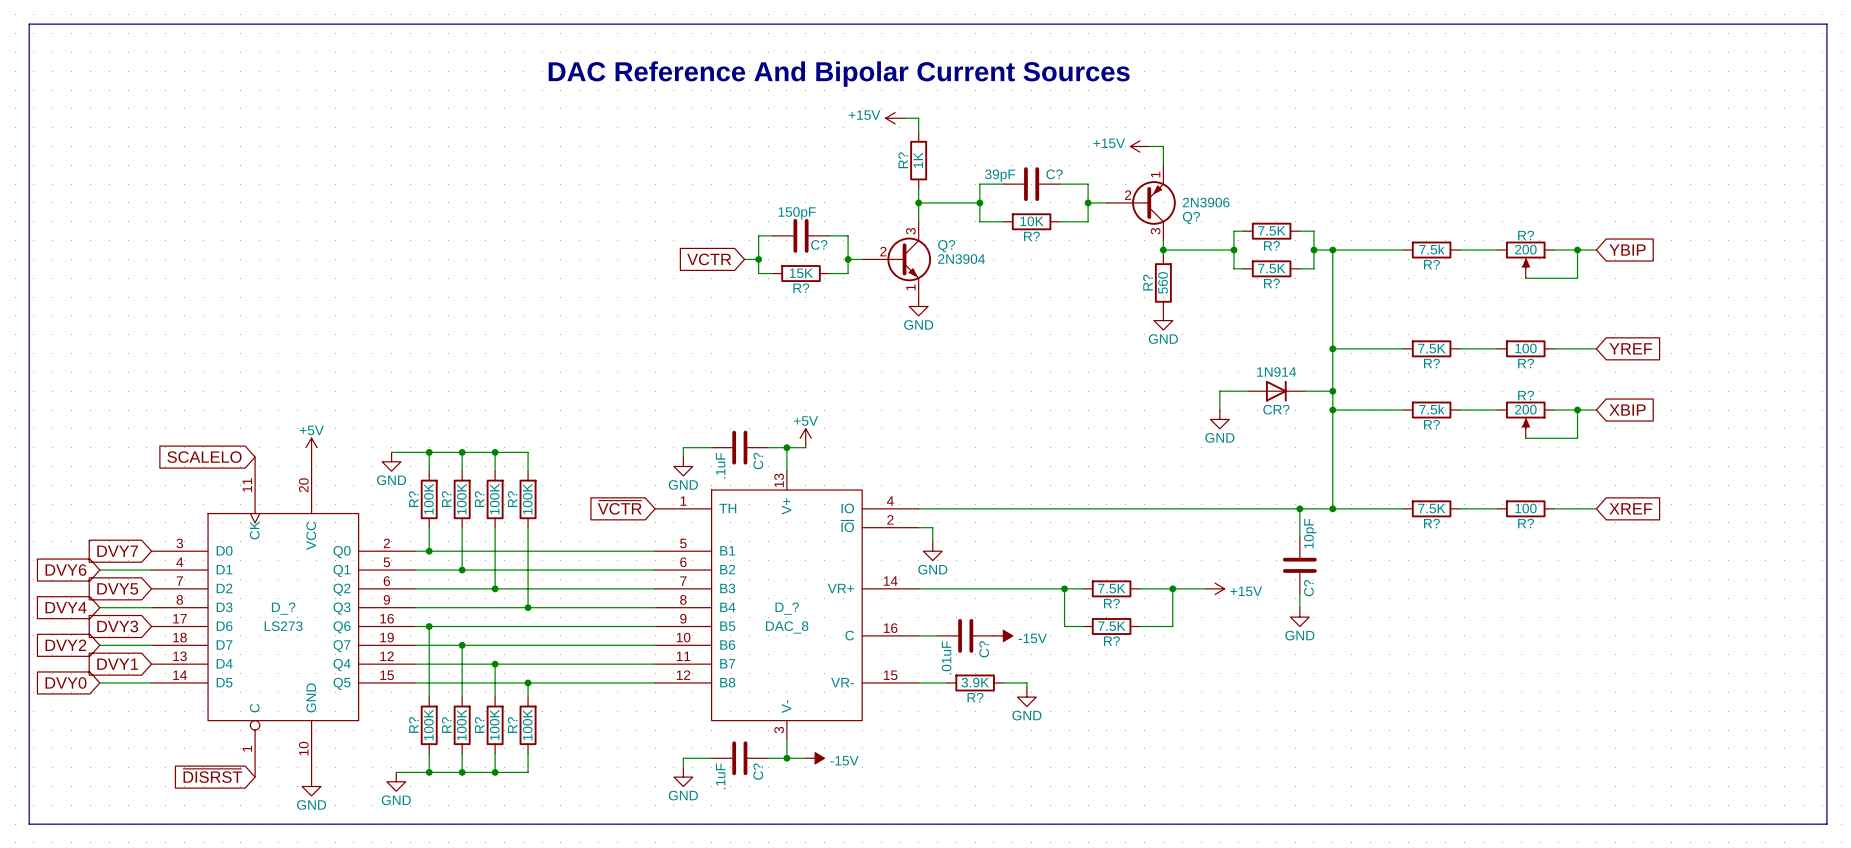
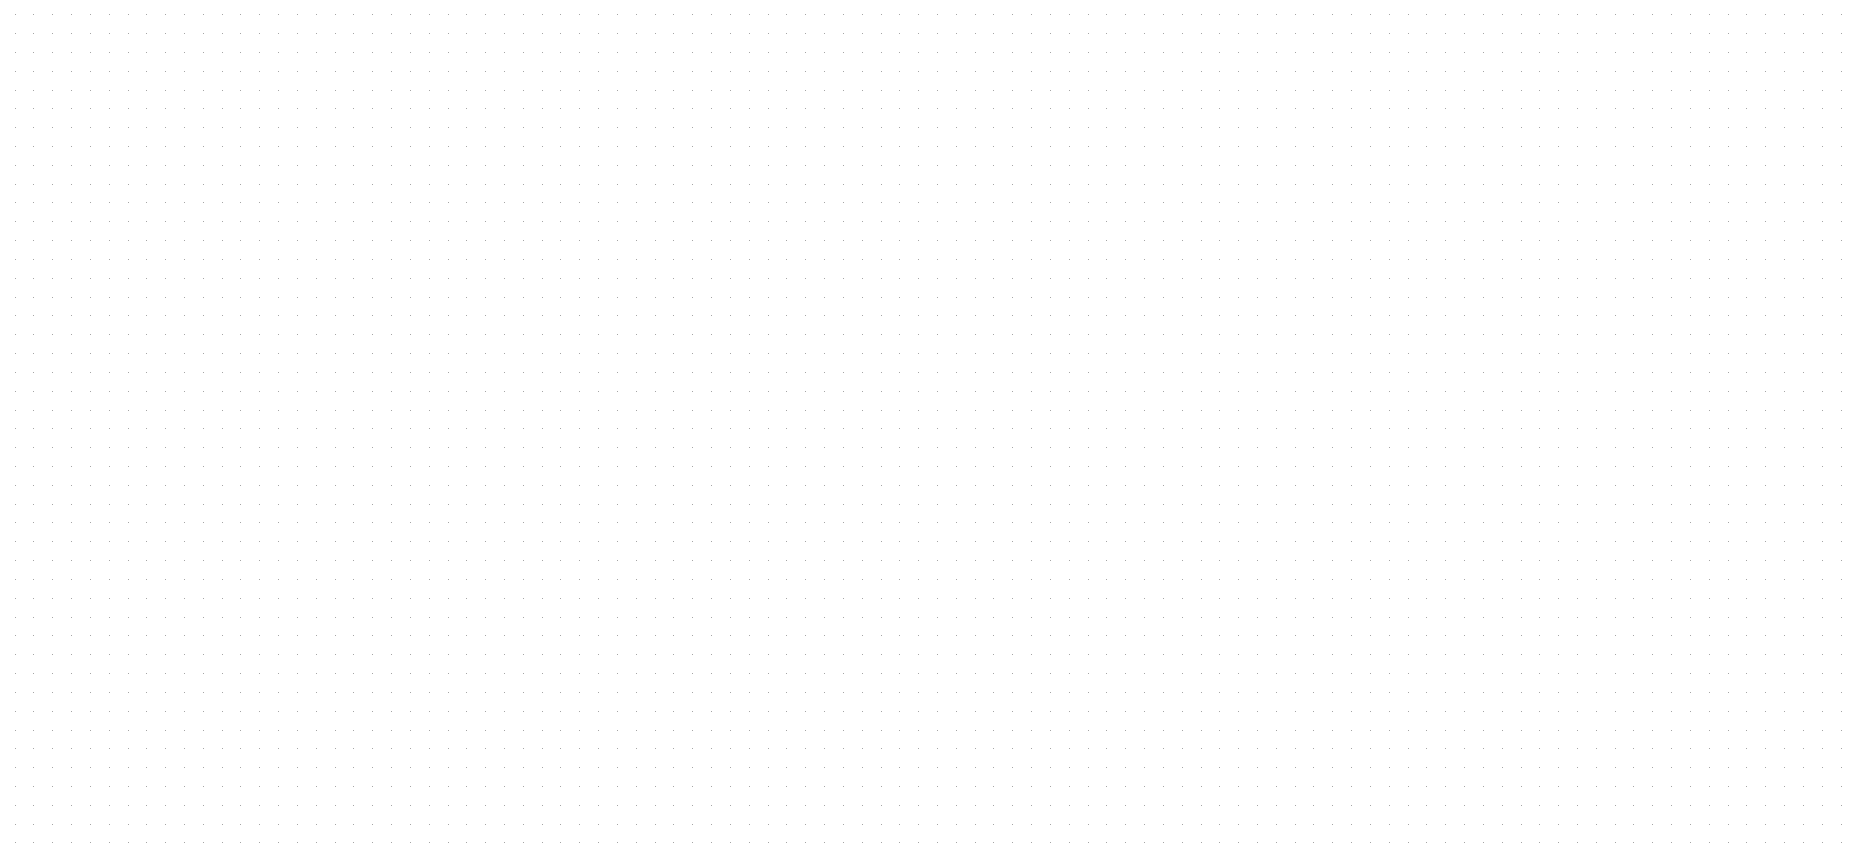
line: (29, 24) (29, 824) (1826, 824) (1826, 24) (29, 24) -> none
text: DAC Reference And Bipolar Current Sources (839, 74) -> none
power symbol: +15V (895, 118) -> none
wire: (904, 118) (918, 118) (918, 132) -> none
power symbol: +15V (1139, 146) -> none
wire: (1149, 146) (1163, 146) (1163, 165) -> none
R?: 1K (918, 160) -> none
wire: (1003, 184) (979, 184) (979, 221) (1003, 221) -> none
C?: 39pF (1031, 184) -> none
wire: (1059, 184) (1088, 184) (1088, 221) (1059, 221) -> none
wire: (918, 188) (918, 221) -> none
wire: (918, 202) (979, 202) -> none
junction: (918, 202) -> none
junction: (979, 202) -> none
wire: (1088, 202) (1106, 202) -> none
junction: (1088, 202) -> none
Q?: 2N3906 (1141, 202) -> none
R?: 10K (1031, 221) -> none
wire: (1243, 231) (1233, 231) (1233, 268) (1243, 268) -> none
R?: 7.5K (1271, 231) -> none
wire: (1299, 231) (1313, 231) (1313, 268) (1299, 268) -> none
wire: (772, 235) (758, 235) (758, 273) (772, 273) -> none
C?: 150pF (801, 235) -> none
wire: (829, 235) (848, 235) (848, 273) (829, 273) -> none
wire: (1163, 240) (1163, 254) -> none
wire: (1163, 250) (1233, 250) -> none
junction: (1163, 250) -> none
junction: (1233, 250) -> none
wire: (1313, 250) (1403, 250) -> none
junction: (1313, 250) -> none
wire: (1332, 250) (1332, 508) -> none
junction: (1332, 250) -> none
R?: 7.5k (1431, 250) -> none
wire: (1459, 250) (1497, 250) -> none
wire: (1553, 250) (1596, 250) -> none
wire: (1577, 250) (1577, 278) (1525, 278) -> none
junction: (1577, 250) -> none
global label: YBIP (1627, 250) -> none
global label: VCTR (709, 259) -> none
wire: (744, 259) (758, 259) -> none
junction: (758, 259) -> none
wire: (848, 259) (862, 259) -> none
junction: (848, 259) -> none
Q?: 2N3904 (896, 259) -> none
R?: 200 (1525, 259) -> none
R?: 7.5K (1271, 268) -> none
R?: 15K (801, 273) -> none
R?: 560 (1163, 282) -> none
power symbol: GND (918, 306) -> none
power symbol: GND (1163, 320) -> none
wire: (1332, 348) (1403, 348) -> none
junction: (1332, 348) -> none
R?: 7.5K (1431, 348) -> none
wire: (1459, 348) (1497, 348) -> none
R?: 100 (1525, 348) -> none
wire: (1553, 348) (1596, 348) -> none
global label: YREF (1630, 348) -> none
wire: (1248, 391) (1219, 391) (1219, 410) -> none
CR?: 1N914 (1276, 391) -> none
wire: (1304, 391) (1332, 391) -> none
junction: (1332, 391) -> none
wire: (1332, 410) (1403, 410) -> none
junction: (1332, 410) -> none
R?: 7.5k (1431, 410) -> none
wire: (1459, 410) (1497, 410) -> none
wire: (1553, 410) (1596, 410) -> none
wire: (1577, 410) (1577, 438) (1525, 438) -> none
junction: (1577, 410) -> none
global label: XBIP (1627, 410) -> none
power symbol: GND (1219, 419) -> none
R?: 200 (1525, 419) -> none
power symbol: +5V (805, 438) -> none
power symbol: +5V (311, 447) -> none
wire: (711, 447) (683, 447) (683, 457) -> none
C?: .1uF (739, 447) -> none
wire: (768, 447) (805, 447) -> none
wire: (786, 447) (786, 471) -> none
junction: (786, 447) -> none
wire: (391, 452) (528, 452) (528, 471) -> none
wire: (429, 452) (429, 471) -> none
junction: (429, 452) -> none
wire: (462, 452) (462, 471) -> none
junction: (462, 452) -> none
wire: (495, 452) (495, 471) -> none
junction: (495, 452) -> none
global label: SCALELO (204, 457) -> none
power symbol: GND (391, 461) -> none
power symbol: GND (683, 466) -> none
R?: 100K (429, 499) -> none
R?: 100K (462, 499) -> none
R?: 100K (495, 499) -> none
R?: 100K (528, 499) -> none
global label: ~{VCTR} (619, 507) -> none
wire: (918, 508) (1403, 508) -> none
wire: (1299, 508) (1299, 537) -> none
junction: (1299, 508) -> none
junction: (1332, 508) -> none
R?: 7.5K (1431, 508) -> none
wire: (1459, 508) (1497, 508) -> none
R?: 100 (1525, 508) -> none
wire: (1553, 508) (1596, 508) -> none
global label: XREF (1630, 508) -> none
wire: (429, 527) (429, 551) -> none
wire: (462, 527) (462, 570) -> none
wire: (495, 527) (495, 588) -> none
wire: (528, 527) (528, 607) -> none
wire: (918, 527) (932, 527) (932, 541) -> none
global label: DVY7 (117, 551) -> none
wire: (415, 551) (655, 551) -> none
junction: (429, 551) -> none
power symbol: GND (932, 551) -> none
C?: 10pF (1299, 565) -> none
global label: DVY6 (65, 570) -> none
wire: (99, 570) (151, 570) -> none
wire: (415, 570) (655, 570) -> none
junction: (462, 570) -> none
global label: DVY5 (117, 588) -> none
wire: (415, 588) (655, 588) -> none
junction: (495, 588) -> none
wire: (918, 588) (1083, 588) -> none
wire: (1064, 588) (1064, 626) (1083, 626) -> none
junction: (1064, 588) -> none
R?: 7.5K (1111, 588) -> none
wire: (1139, 588) (1205, 588) -> none
wire: (1172, 588) (1172, 626) (1139, 626) -> none
junction: (1172, 588) -> none
power symbol: +15V (1215, 588) -> none
wire: (1299, 593) (1299, 607) -> none
D_?: DAC_8 (786, 605) -> none
global label: DVY4 (66, 607) -> none
wire: (99, 607) (151, 607) -> none
wire: (415, 607) (655, 607) -> none
junction: (528, 607) -> none
D_?: LS273 (283, 617) -> none
power symbol: GND (1299, 617) -> none
global label: DVY3 (117, 626) -> none
wire: (415, 626) (655, 626) -> none
wire: (429, 626) (429, 697) -> none
junction: (429, 626) -> none
R?: 7.5K (1111, 626) -> none
wire: (918, 635) (937, 635) -> none
C?: .01uF (965, 635) -> none
power symbol: -15V (1003, 635) -> none
global label: DVY2 (65, 645) -> none
wire: (99, 645) (151, 645) -> none
wire: (415, 645) (655, 645) -> none
wire: (462, 645) (462, 697) -> none
junction: (462, 645) -> none
global label: DVY1 (117, 664) -> none
wire: (415, 664) (655, 664) -> none
wire: (495, 664) (495, 697) -> none
junction: (495, 664) -> none
global label: DVY0 (66, 682) -> none
wire: (99, 682) (151, 682) -> none
wire: (415, 682) (655, 682) -> none
wire: (528, 682) (528, 697) -> none
junction: (528, 682) -> none
wire: (918, 682) (946, 682) -> none
R?: 3.9K (975, 682) -> none
wire: (1003, 682) (1026, 682) (1026, 687) -> none
power symbol: GND (1026, 697) -> none
R?: 100K (429, 725) -> none
R?: 100K (462, 725) -> none
R?: 100K (495, 725) -> none
R?: 100K (528, 725) -> none
wire: (786, 739) (786, 758) -> none
wire: (429, 753) (429, 772) -> none
wire: (462, 753) (462, 772) -> none
wire: (495, 753) (495, 772) -> none
wire: (528, 753) (528, 772) (396, 772) -> none
wire: (711, 758) (683, 758) (683, 767) -> none
C?: .1uF (739, 758) -> none
wire: (768, 758) (805, 758) -> none
junction: (786, 758) -> none
power symbol: -15V (815, 758) -> none
junction: (429, 772) -> none
junction: (462, 772) -> none
junction: (495, 772) -> none
global label: ~{DISRST} (212, 775) -> none
power symbol: GND (683, 777) -> none
power symbol: GND (396, 781) -> none
power symbol: GND (311, 786) -> none

